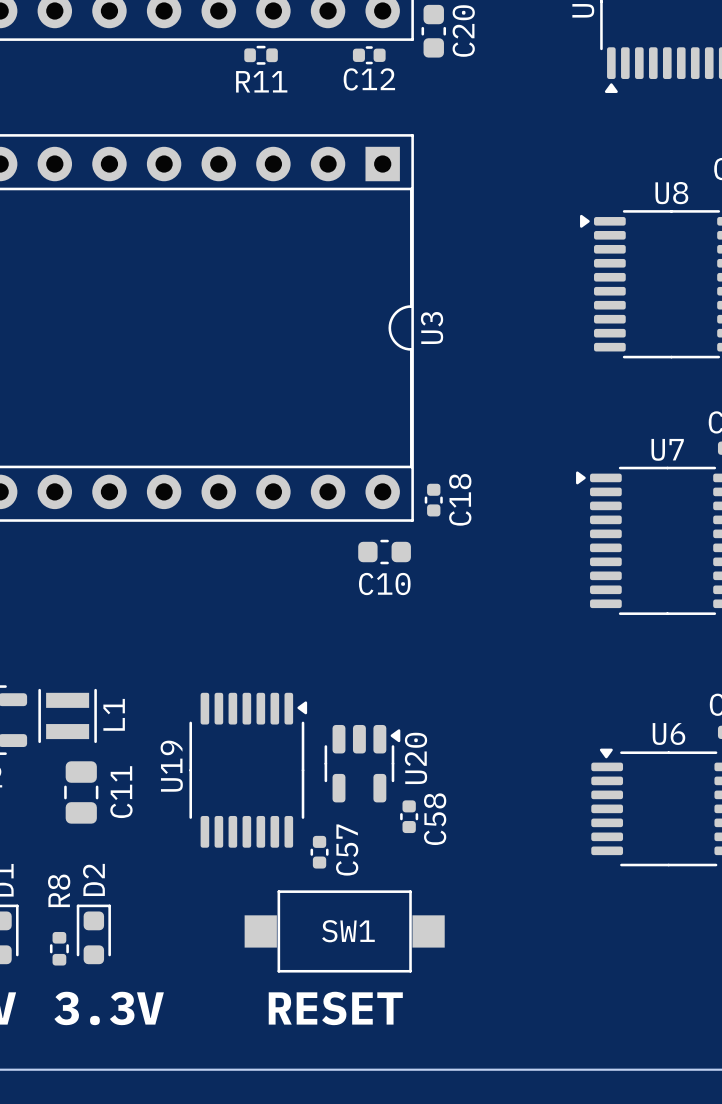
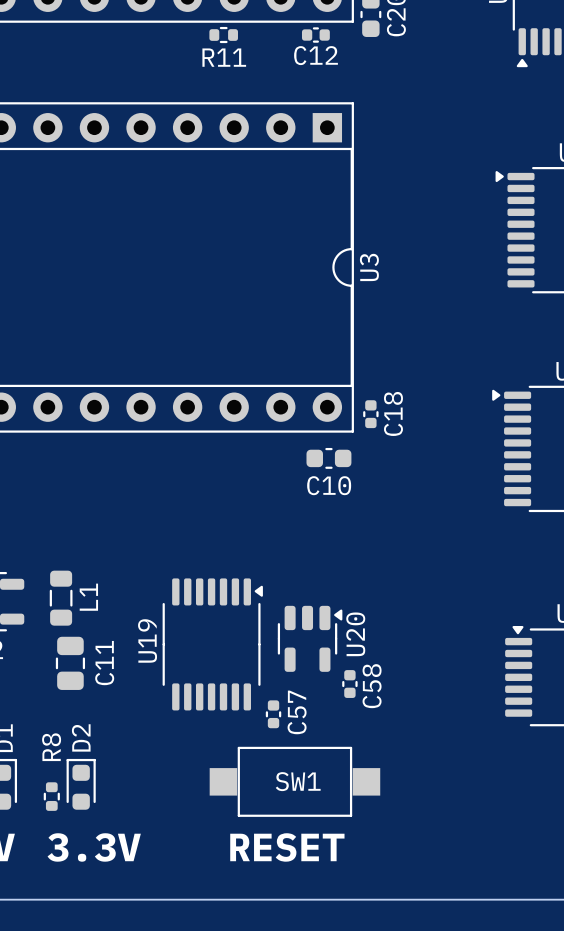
L1 footprint: [38, 688, 97, 744] -> [49, 570, 73, 626]

